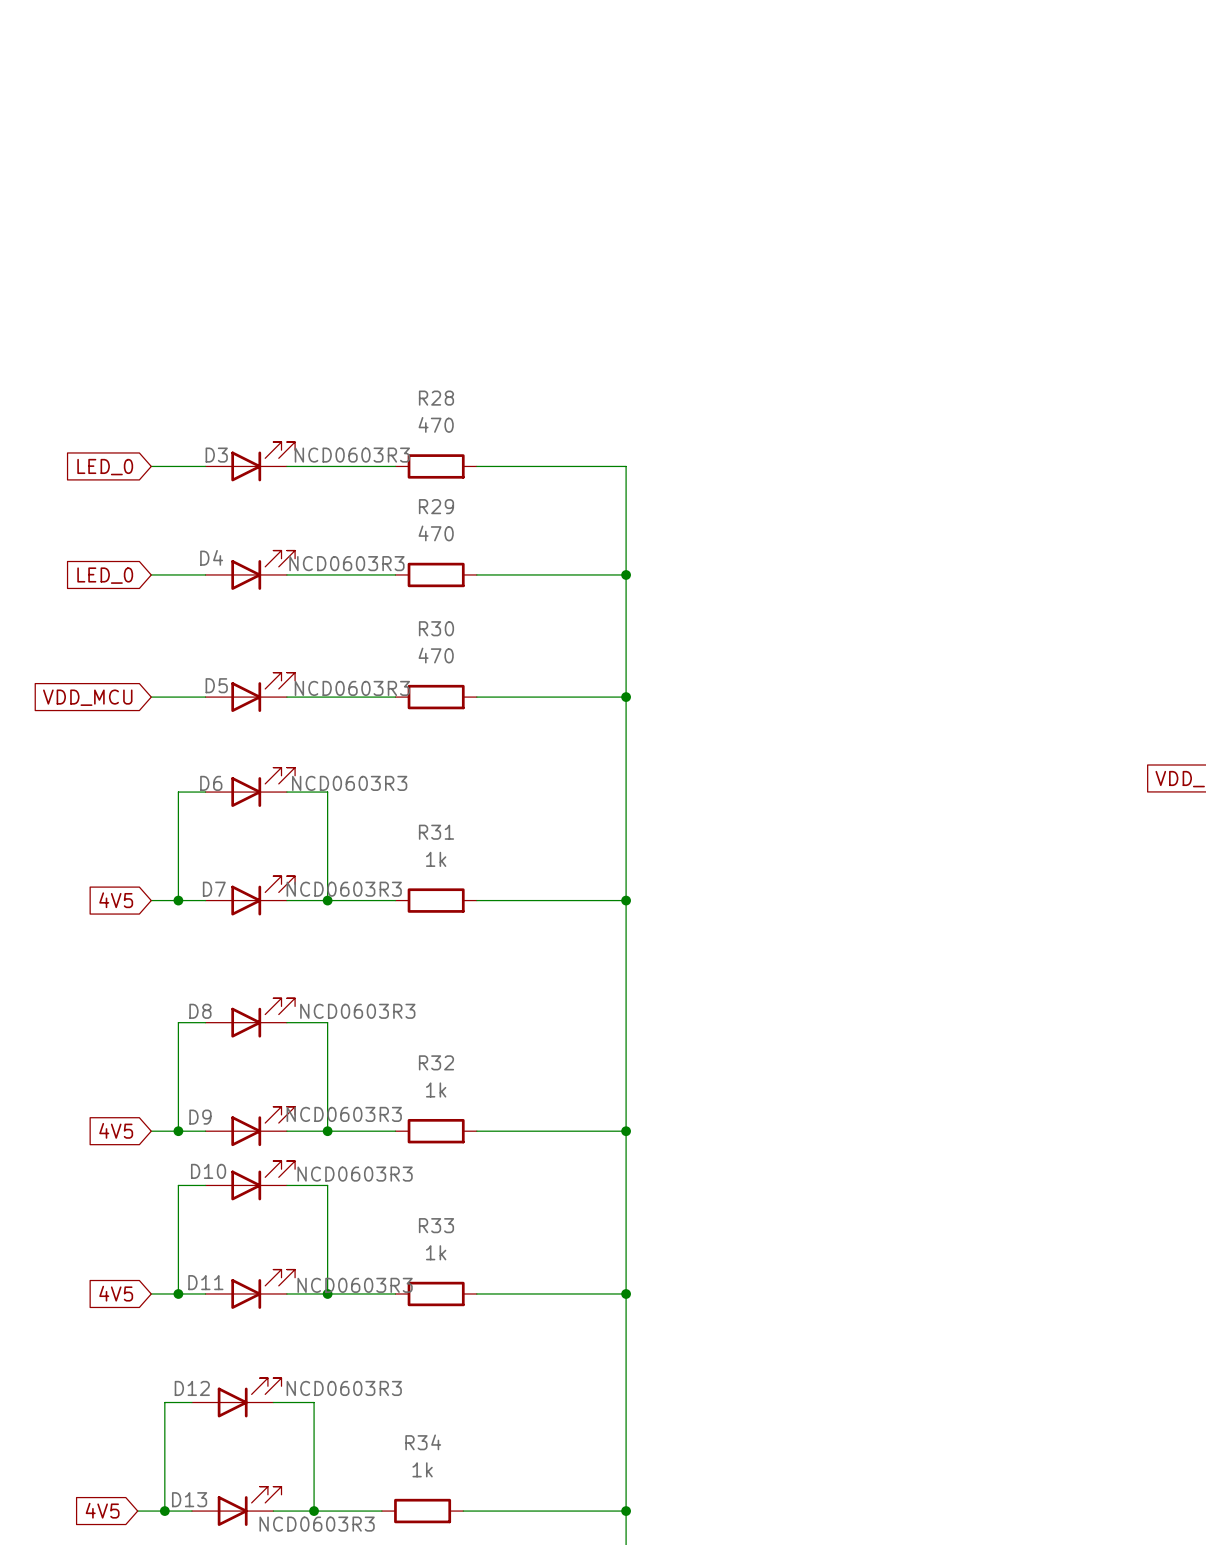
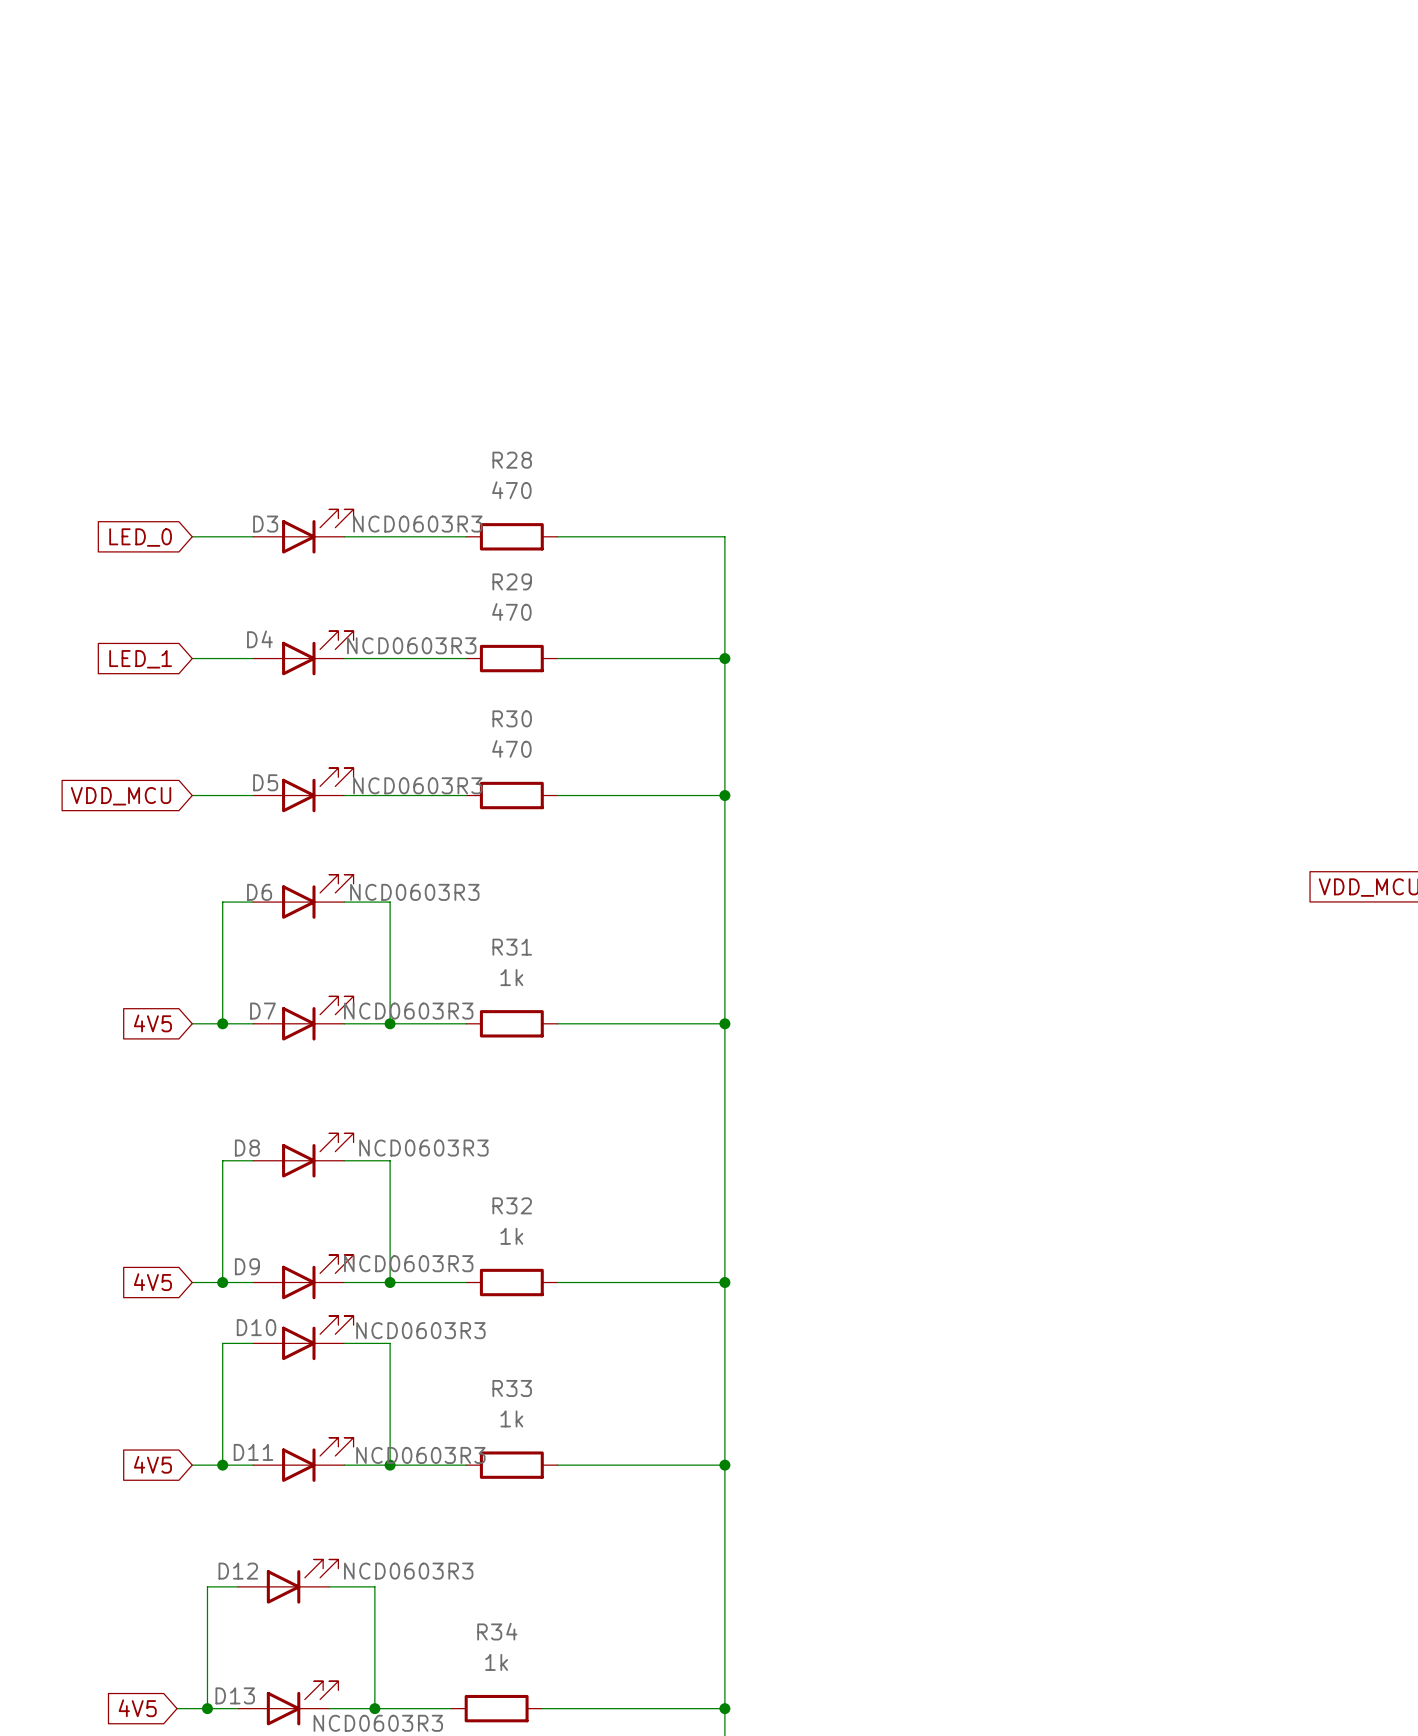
global label: LED_0 (105, 575) -> LED_1 (140, 659)

